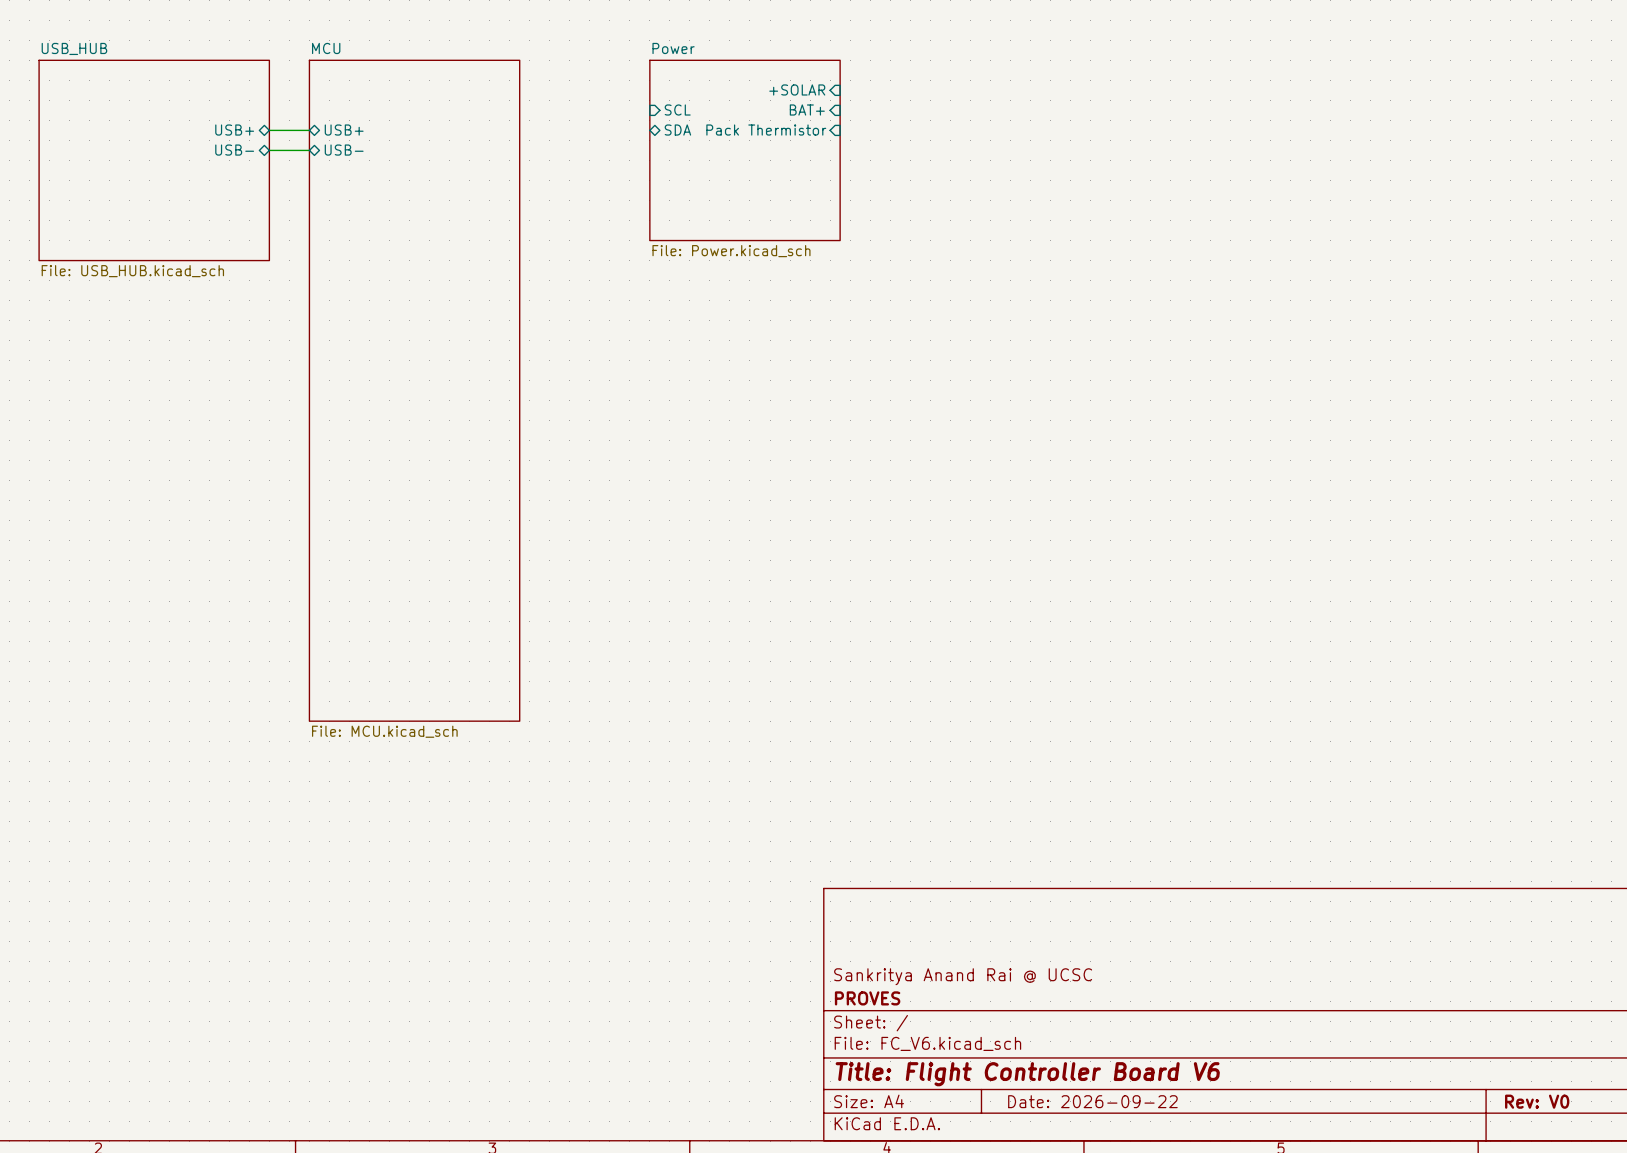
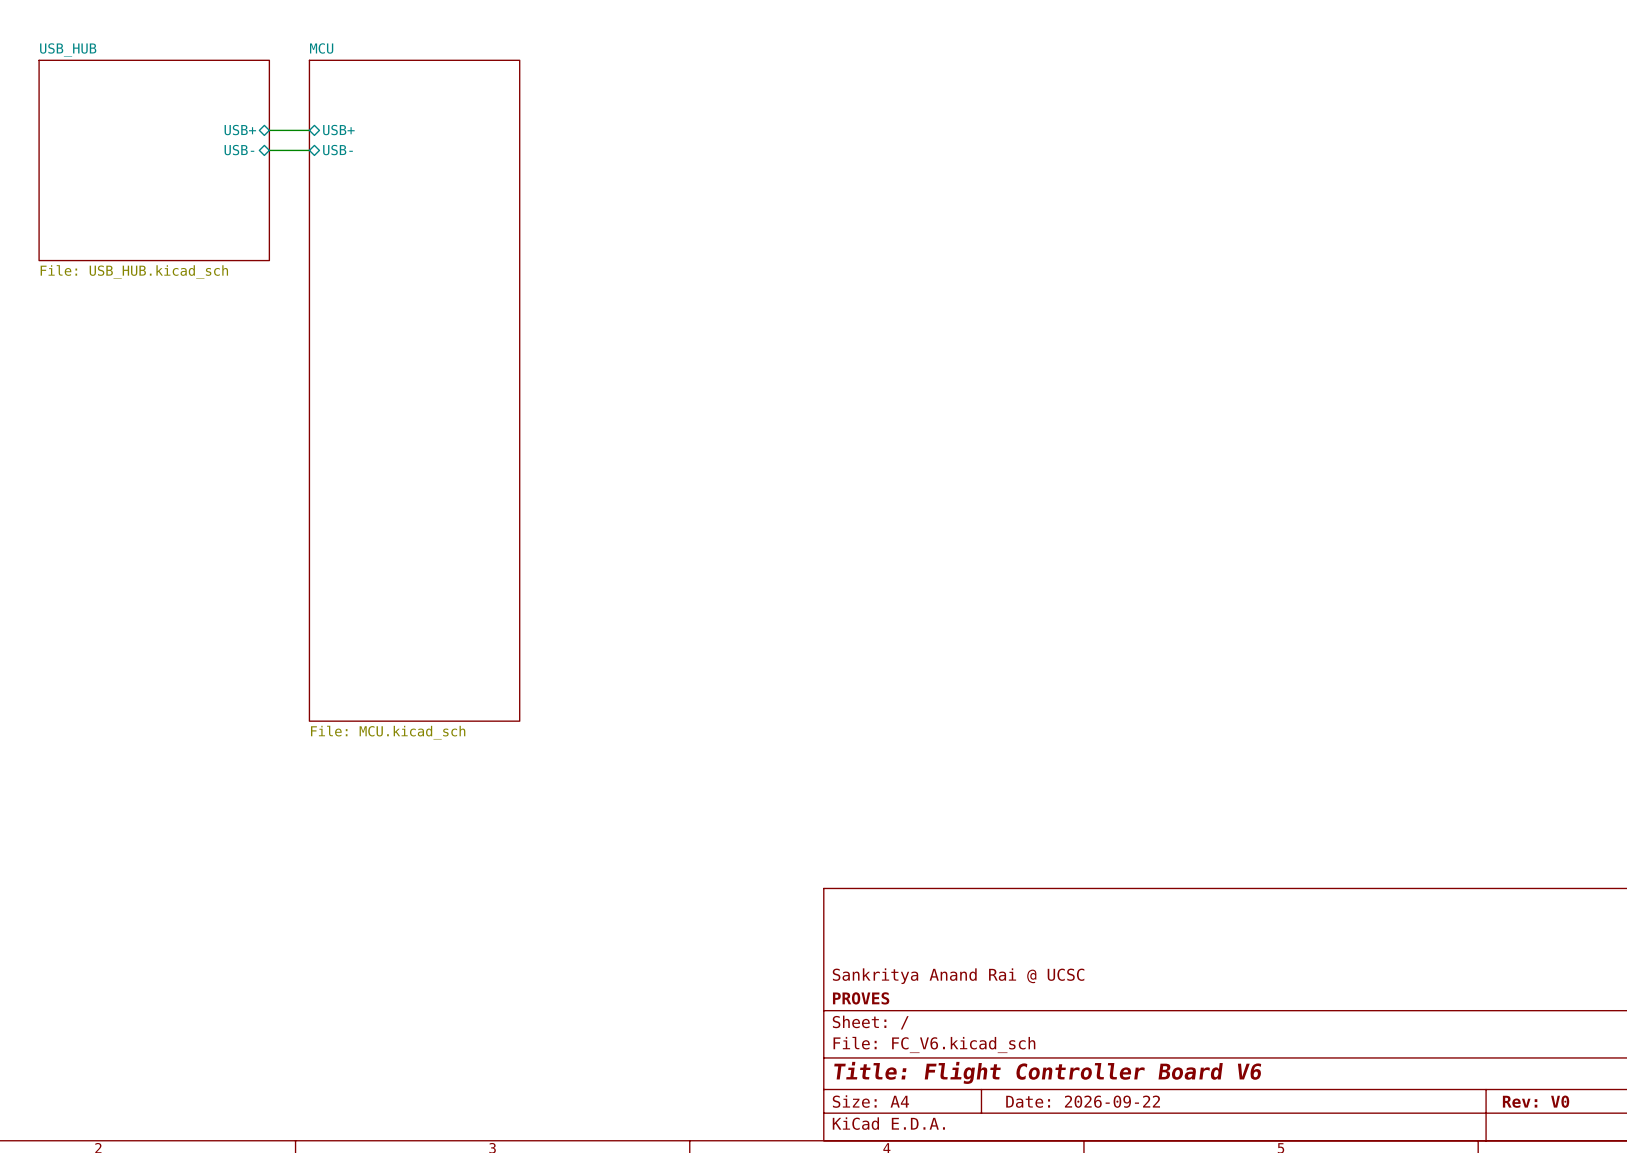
sheet pin: +SOLAR (797, 89) -> none
sheet pin: SCL (677, 110) -> none
sheet pin: BAT+ (807, 110) -> none
sheet pin: SDA (677, 130) -> none
sheet pin: Pack Thermistor (766, 130) -> none
sheet Power: File: Power.kicad_sch (744, 150) -> none

